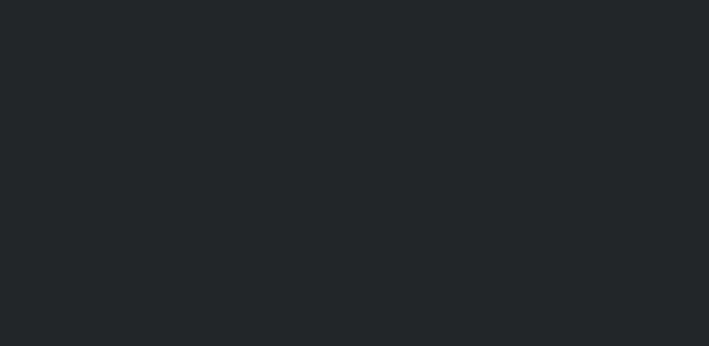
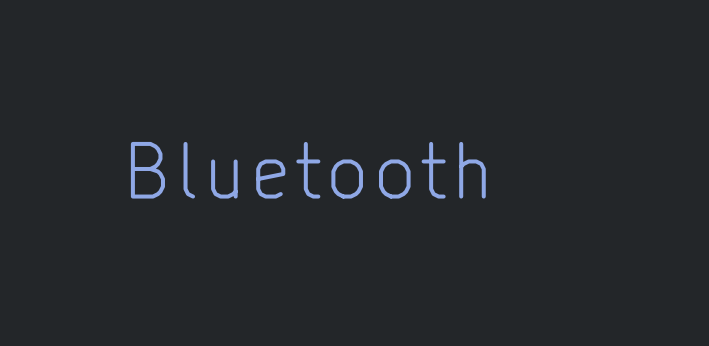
text: none -> Bluetooth (308, 170)

